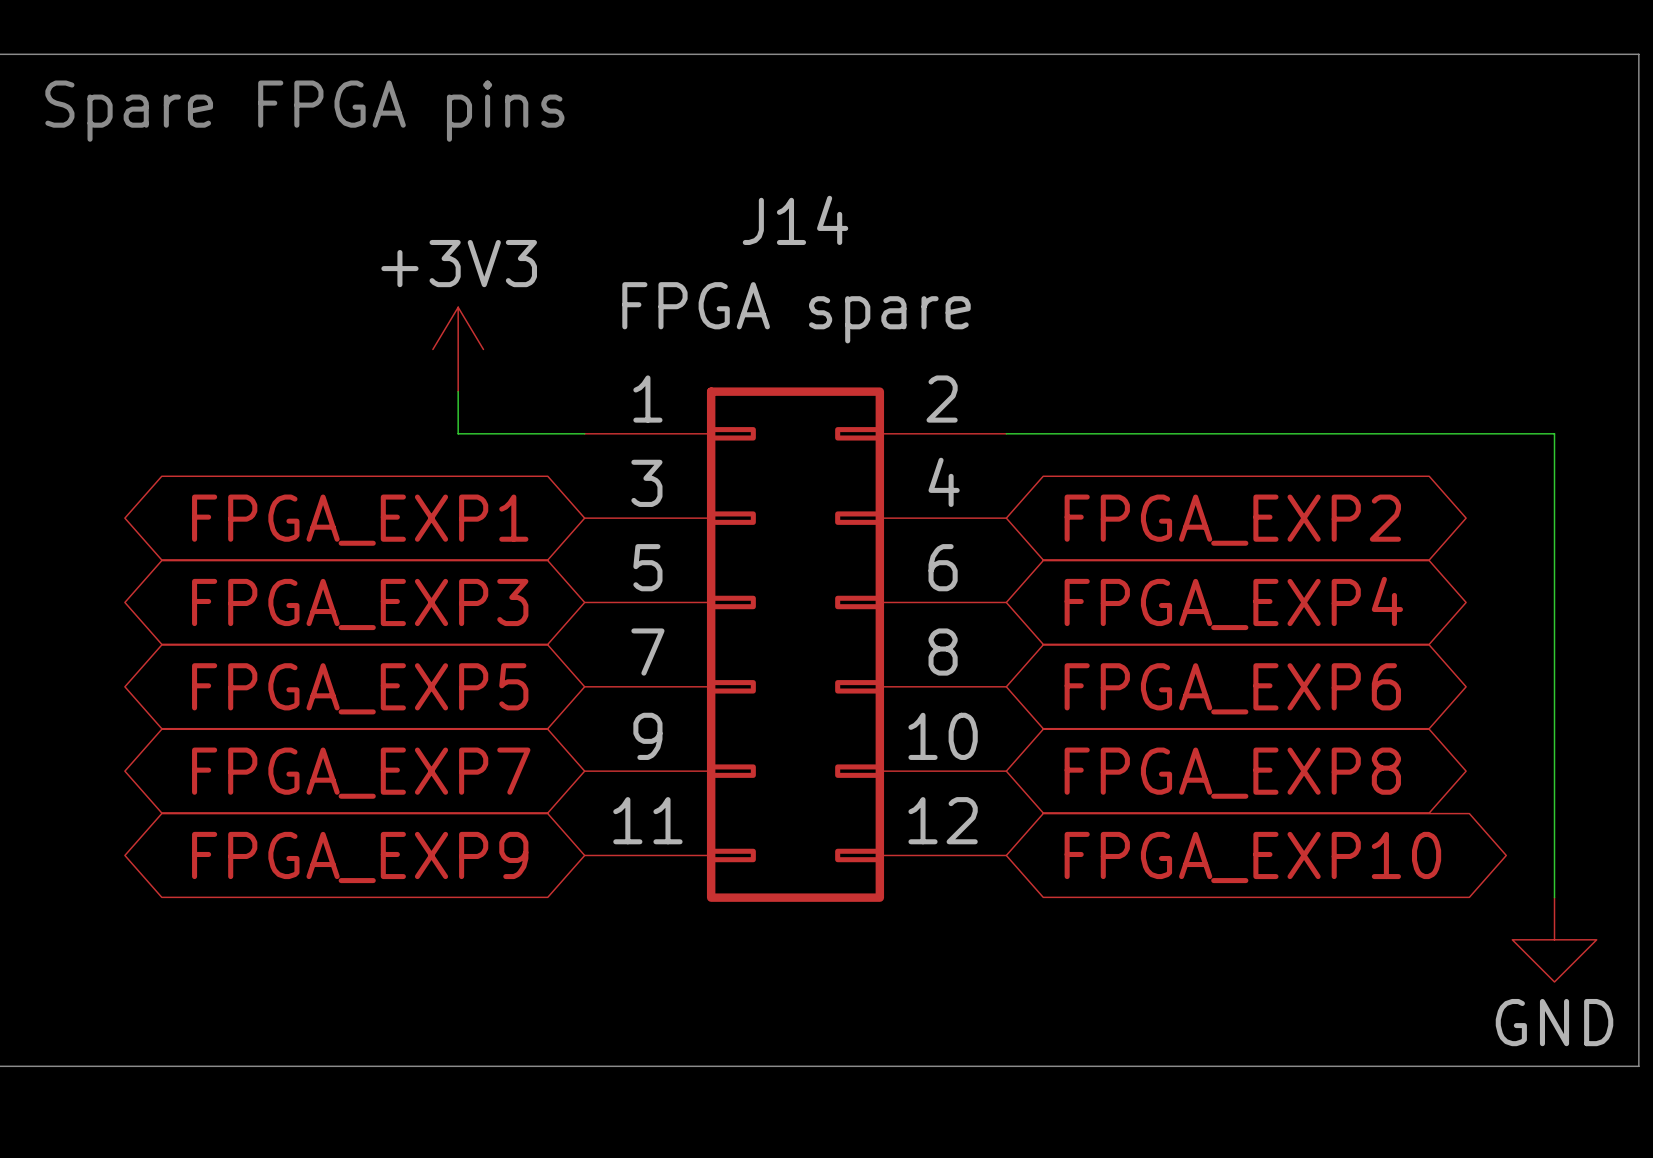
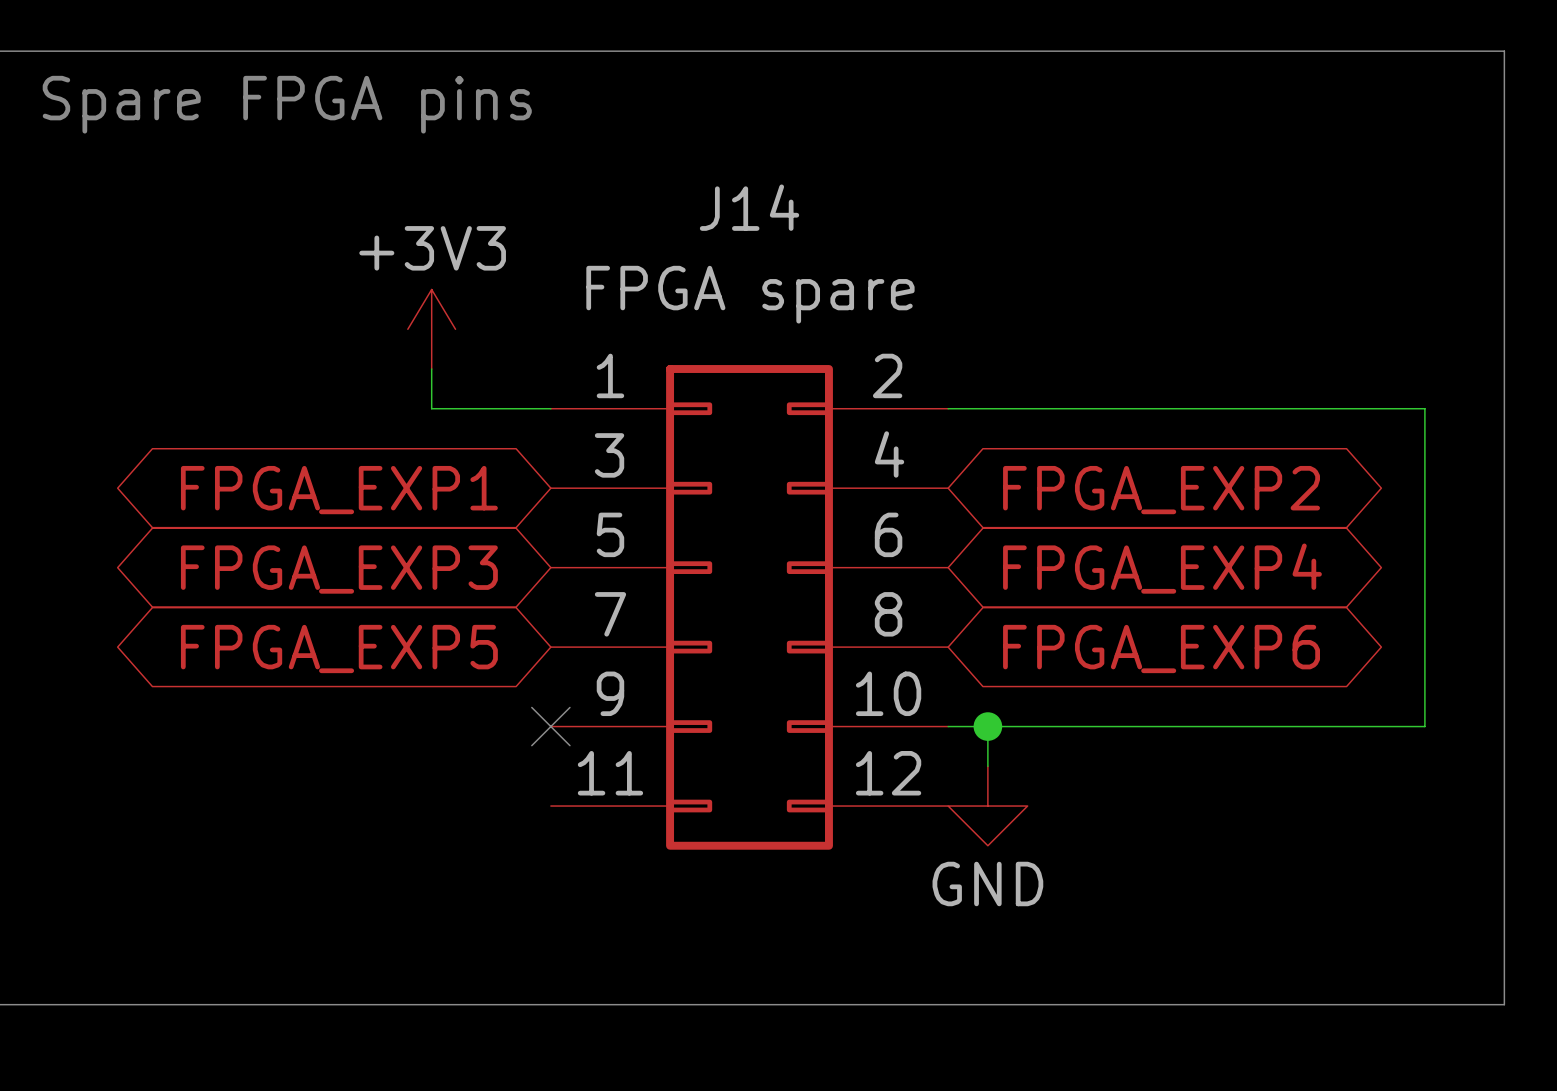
line: (1596, 54) (1638, 54) (1638, 1066) (1596, 1066) -> (1504, 51) (1504, 1004)
wire: (1512, 433) (1554, 433) (1554, 897) -> (1424, 408) (1424, 726) (948, 726)
no-connect mark: none -> (550, 726)
wire: none -> (987, 726) (987, 766)
junction: none -> (987, 726)
global label: FPGA_EXP7 (361, 773) -> none
global label: FPGA_EXP8 (1232, 773) -> none
global label: FPGA_EXP9 (360, 857) -> none
global label: FPGA_EXP10 (1252, 857) -> none
power symbol position: GND (1554, 939) -> GND (987, 806)

